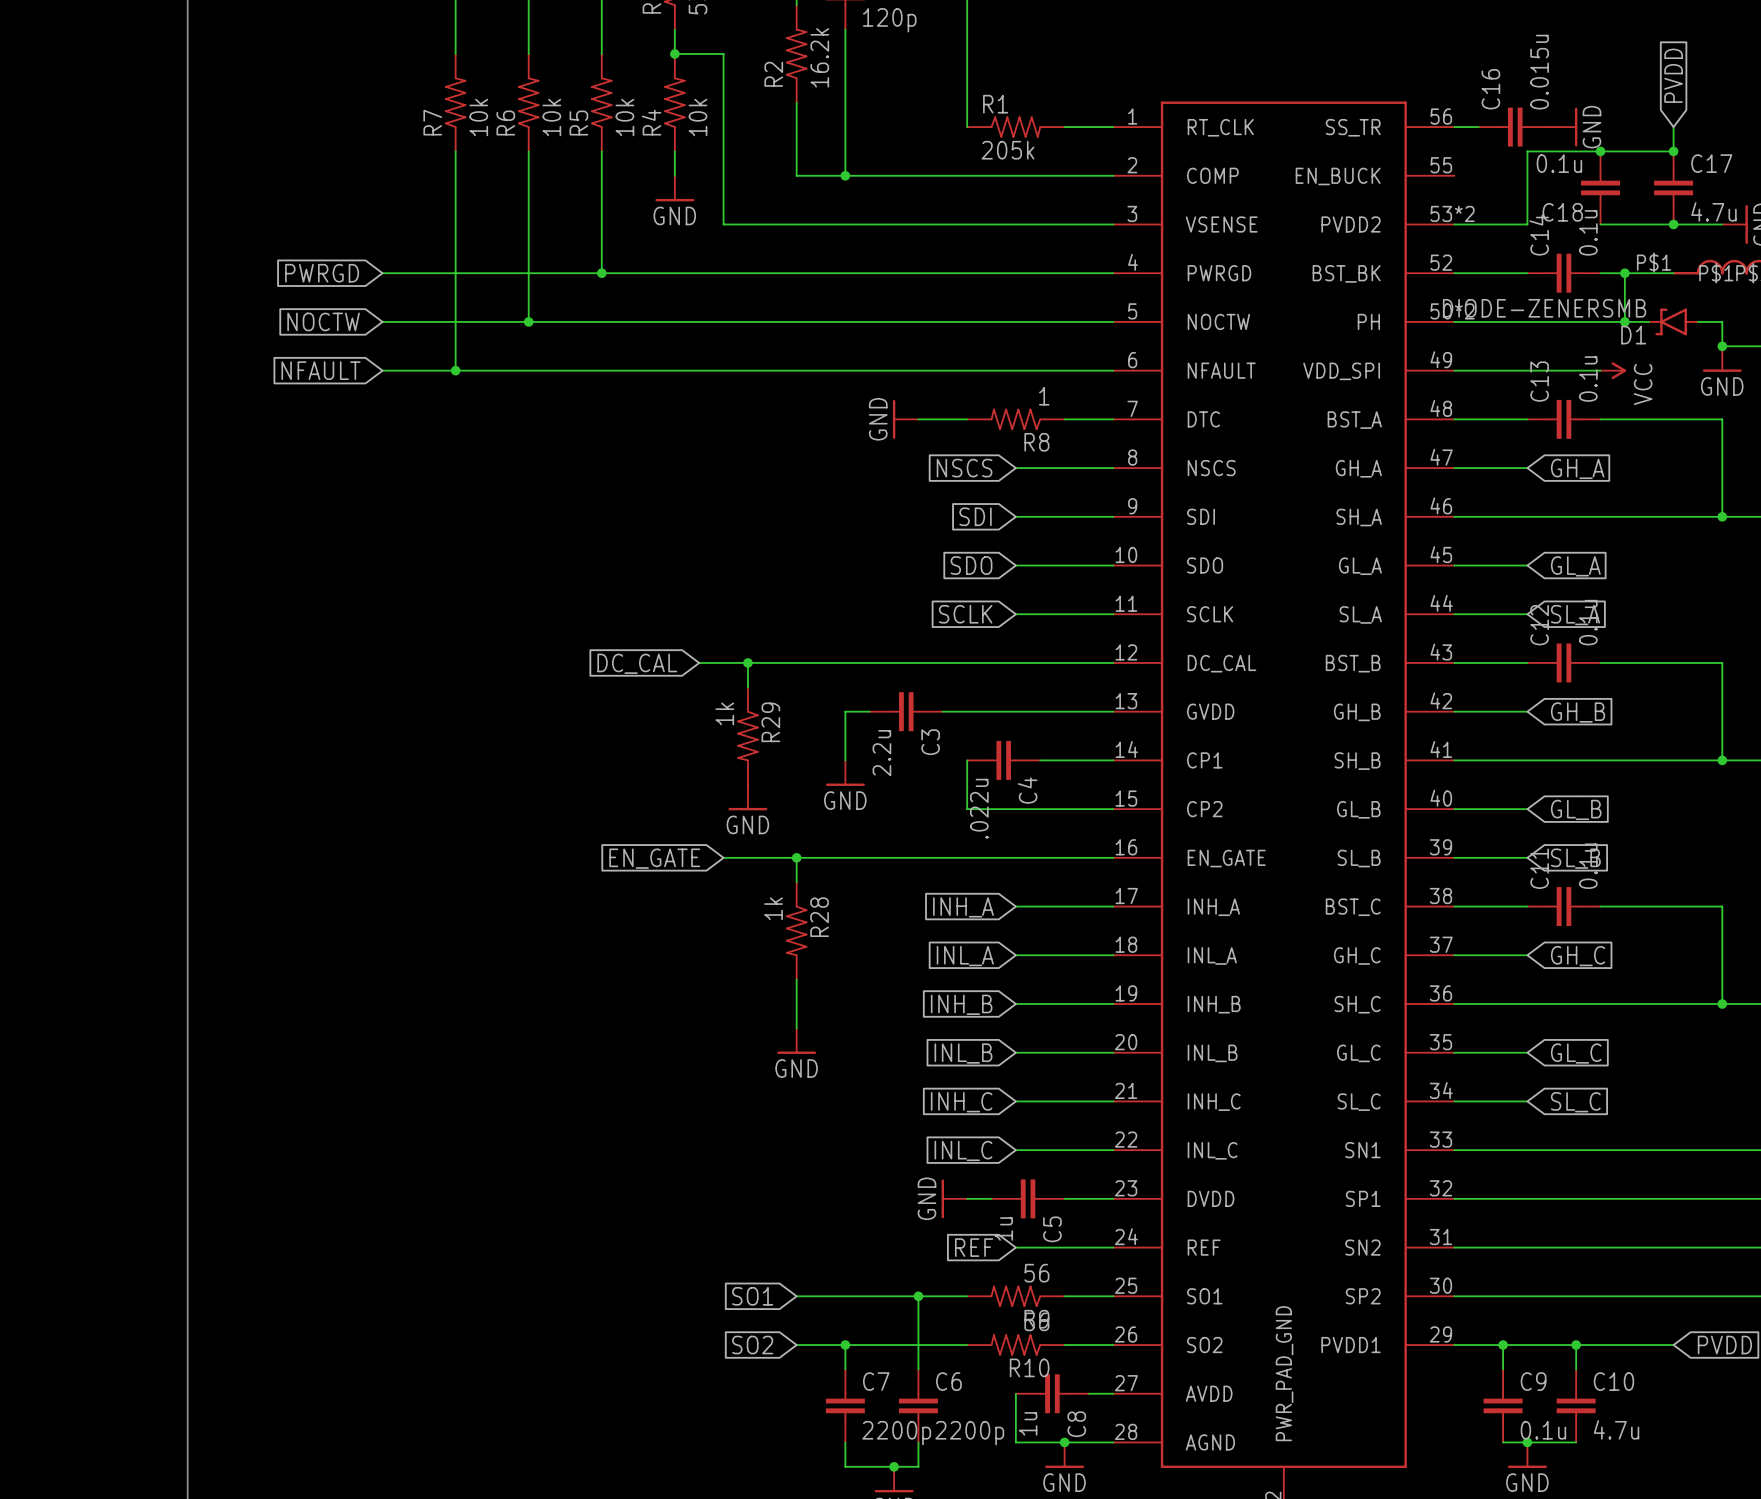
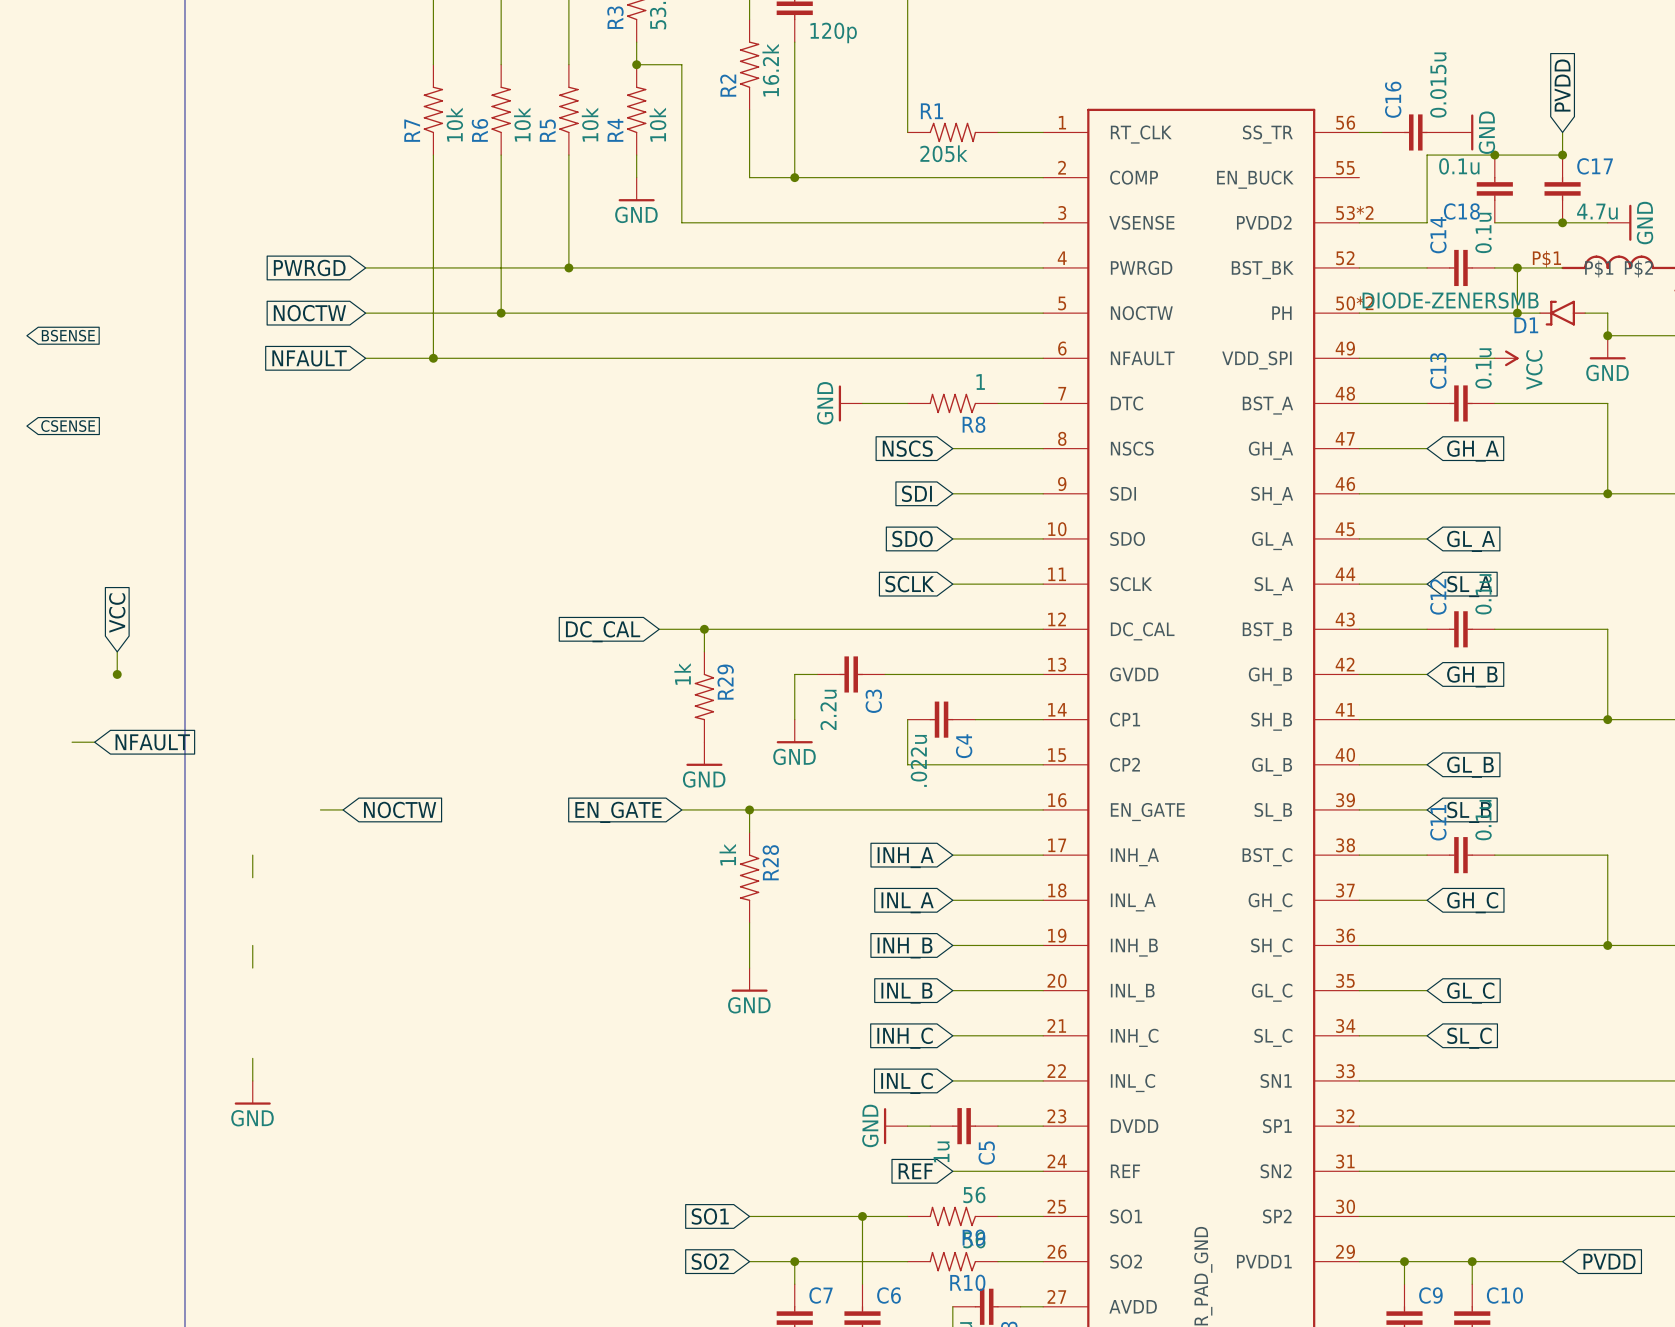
global label: none -> BSENSE (68, 335)
global label: none -> CSENSE (68, 426)
global label: none -> VCC (117, 613)
wire: none -> (117, 651) (117, 674)
junction: none -> (117, 674)
wire: none -> (72, 742) (94, 742)
global label: none -> NFAULT (152, 742)
wire: none -> (320, 809) (343, 809)
global label: none -> NOCTW (400, 809)
wire: none -> (252, 855) (252, 877)
wire: none -> (252, 945) (252, 968)
wire: none -> (252, 1058) (252, 1080)
power symbol: none -> GND (252, 1092)

